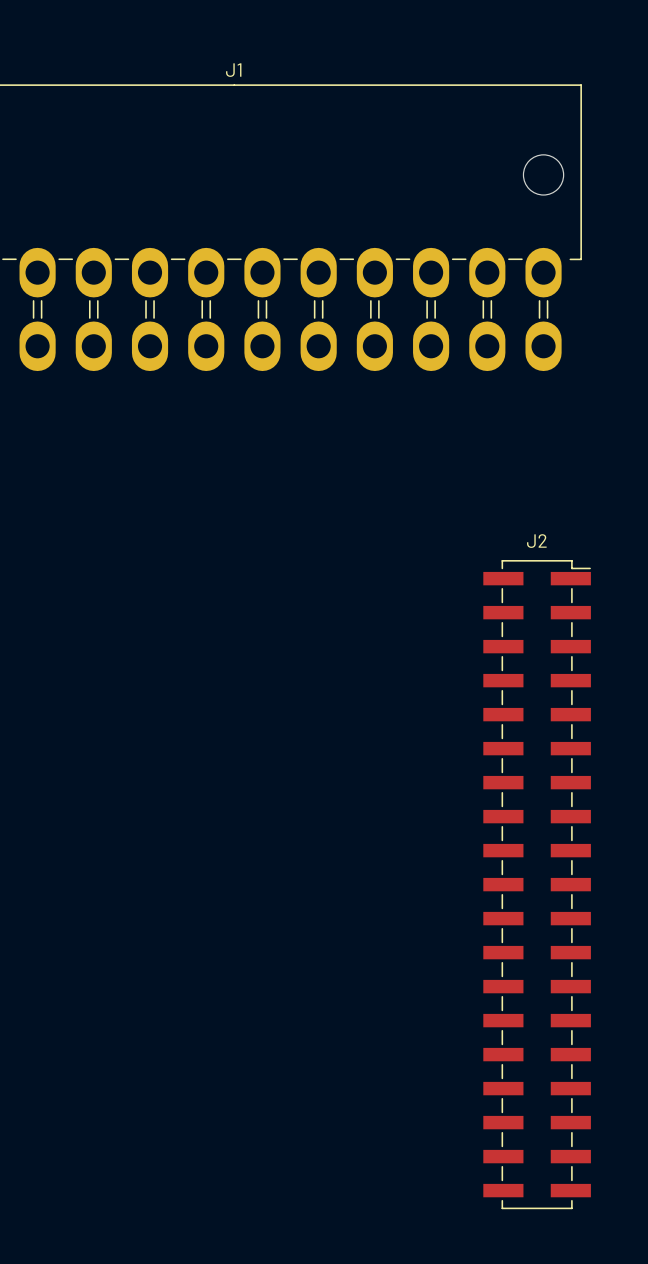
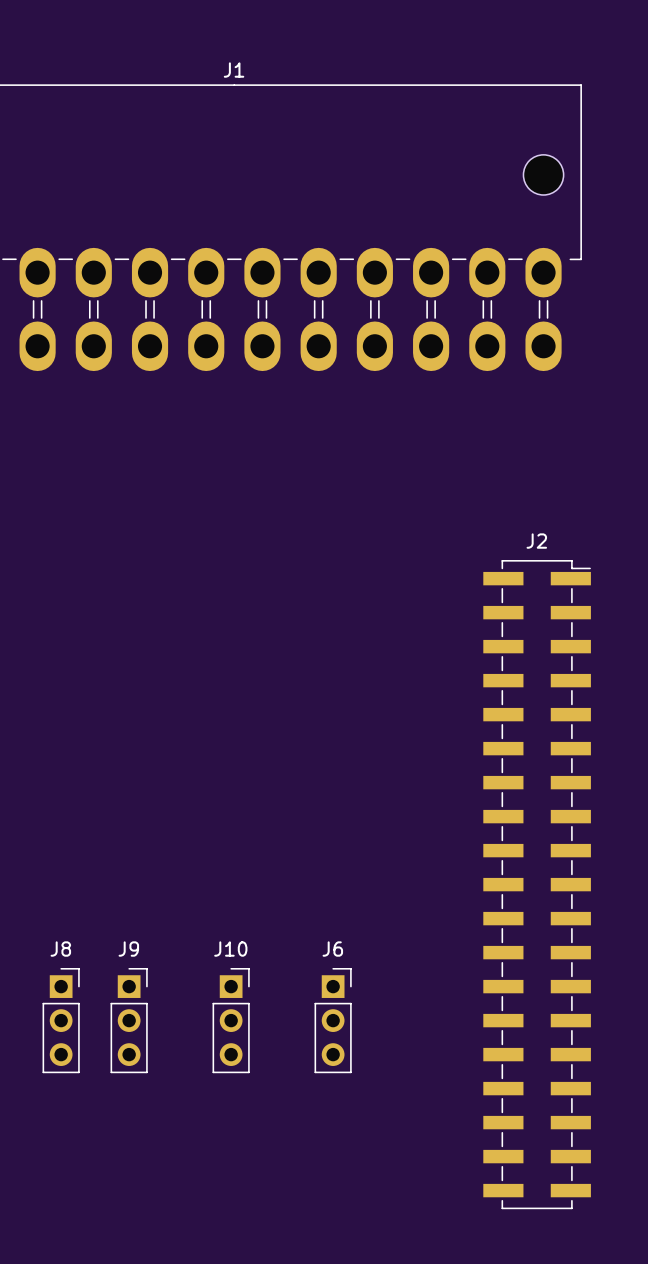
J8: none -> (61, 1020)
J9: none -> (129, 1020)
J10: none -> (231, 1020)
J6: none -> (333, 1020)

